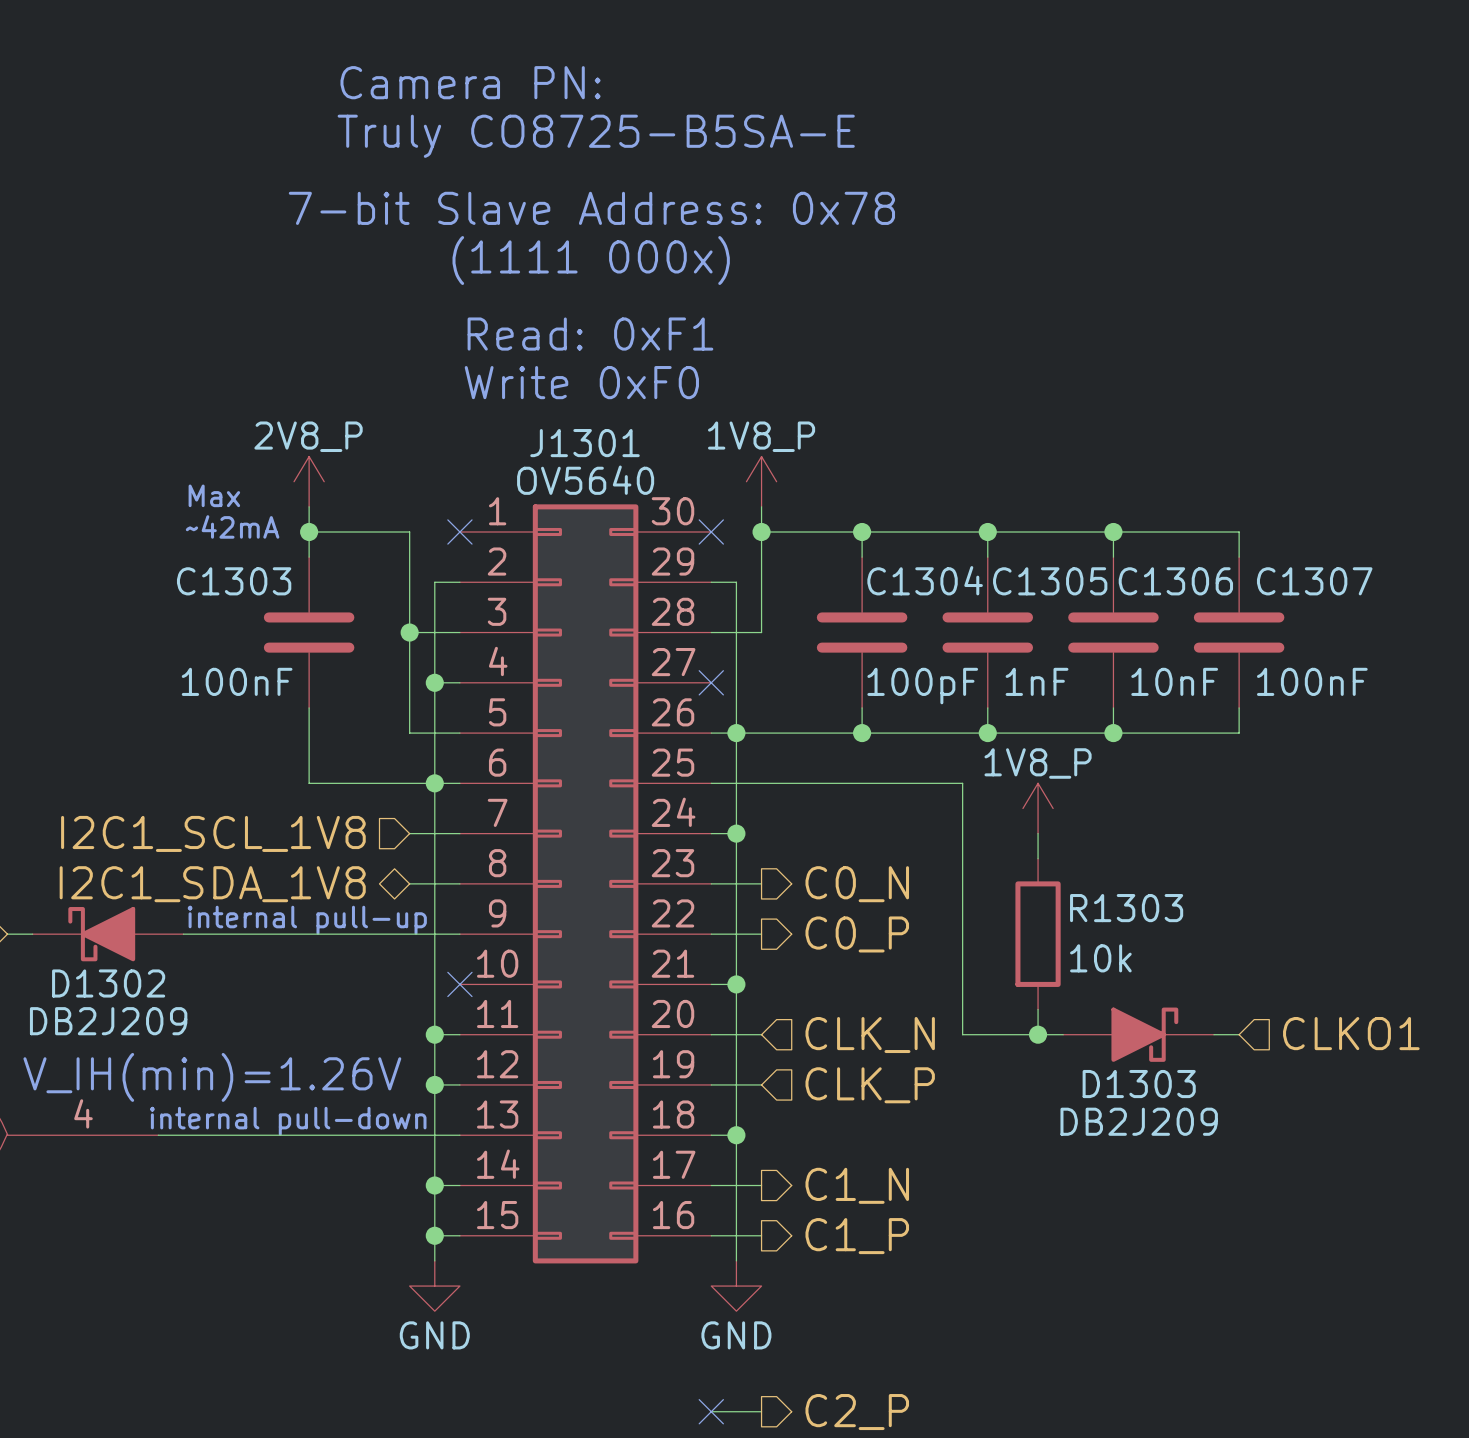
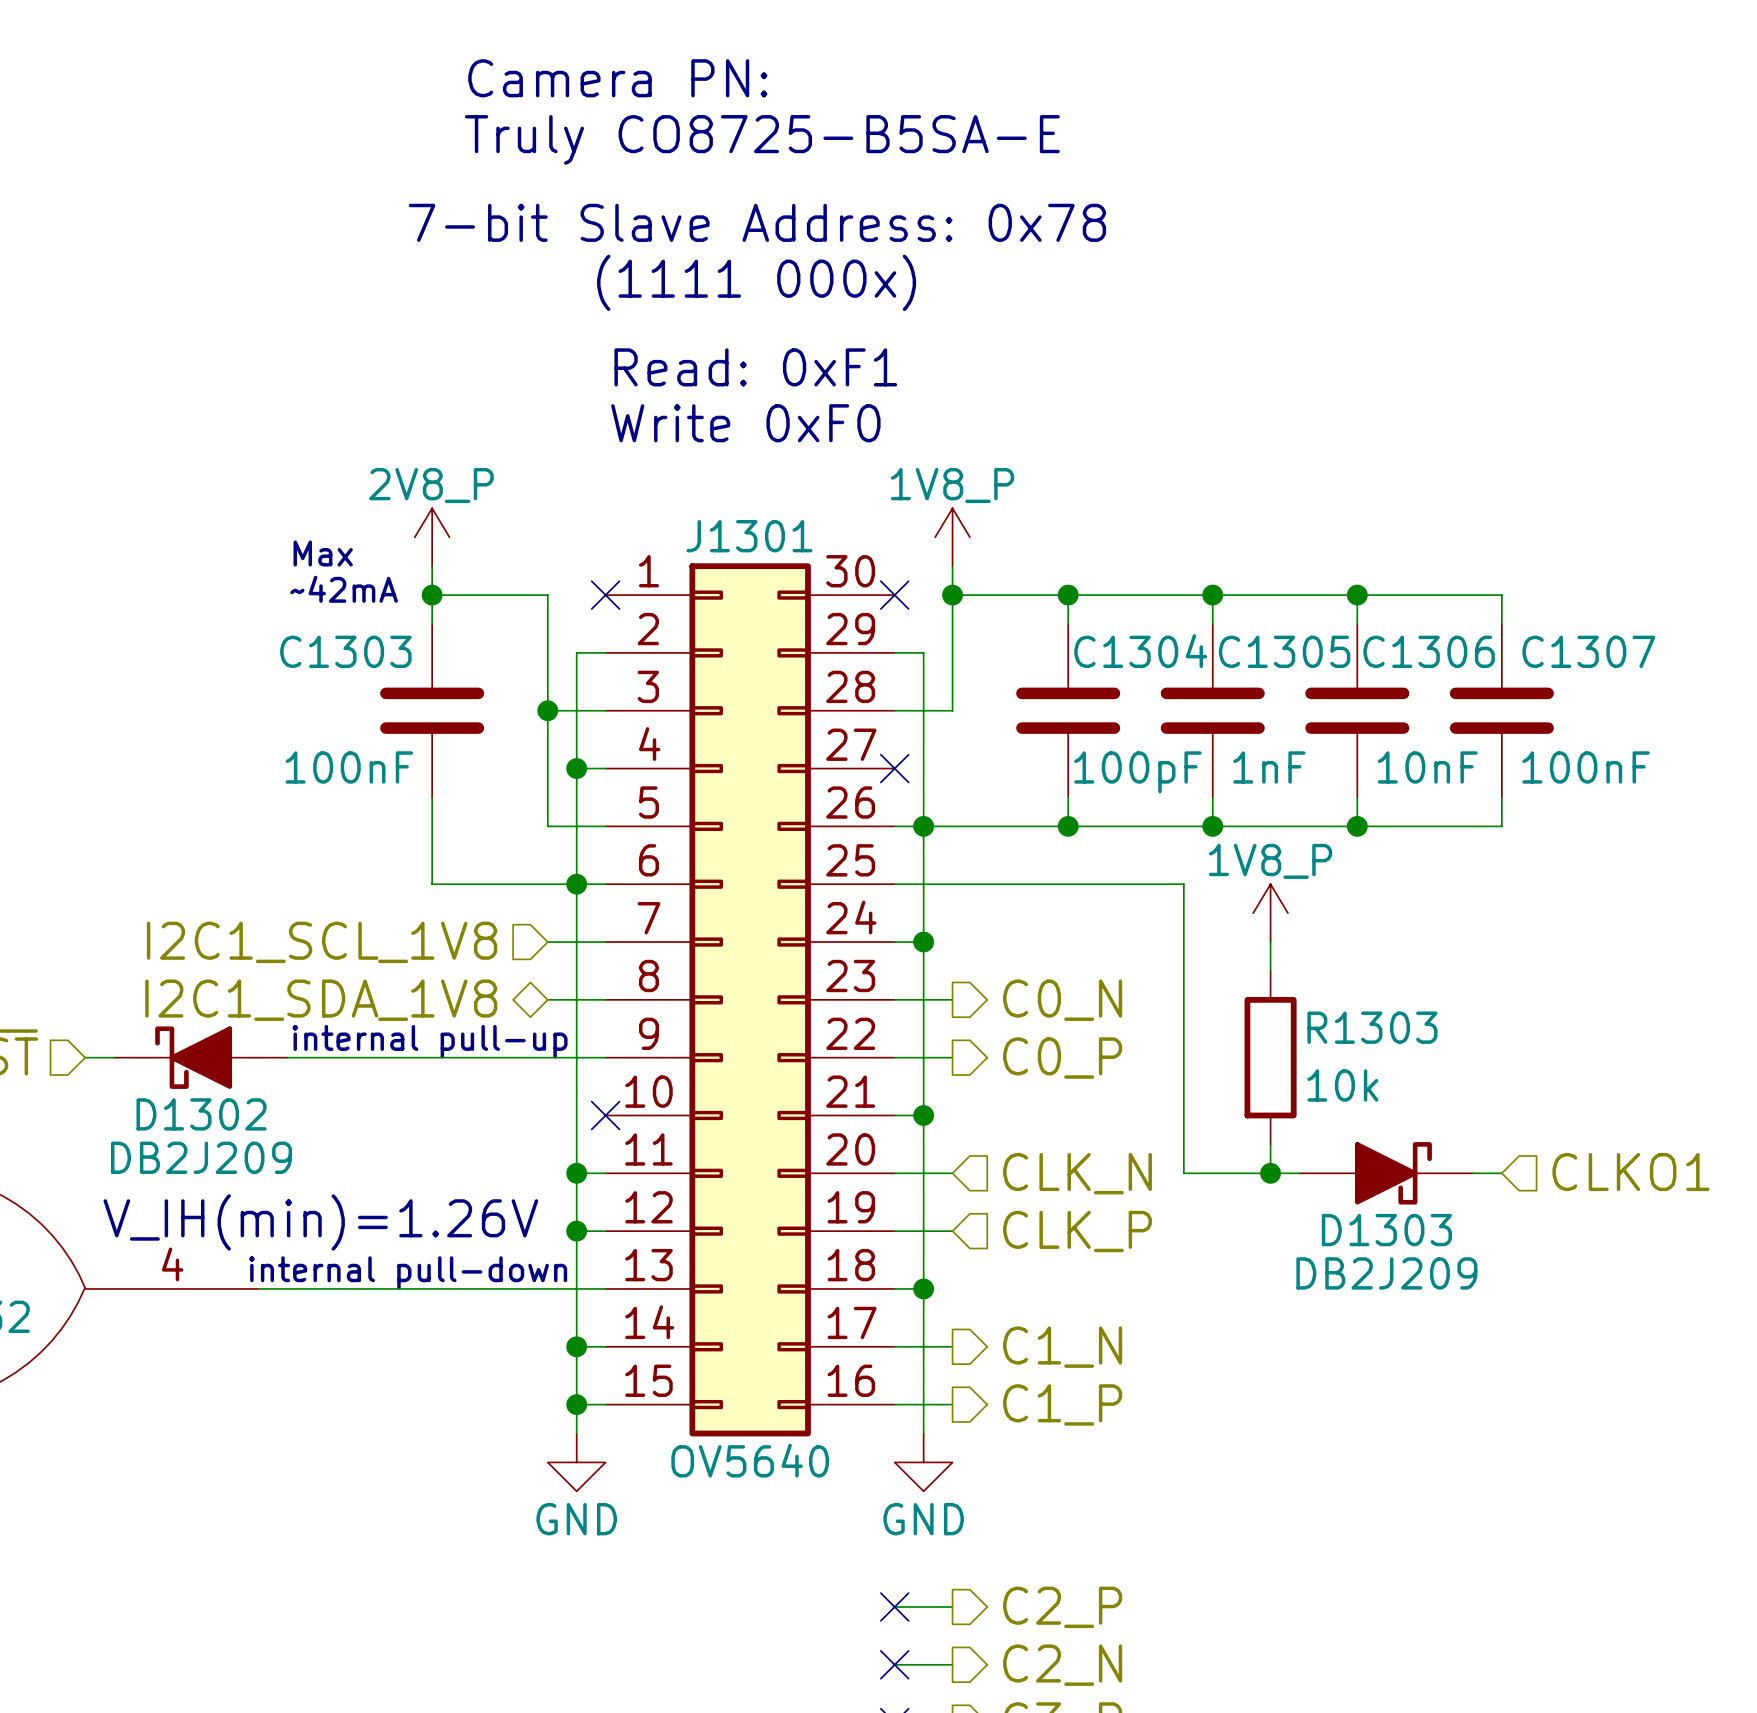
J1301 name position: J1301 (585, 443) -> J1301 (749, 536)
J1301 value position: OV5640 (585, 480) -> OV5640 (750, 1460)

